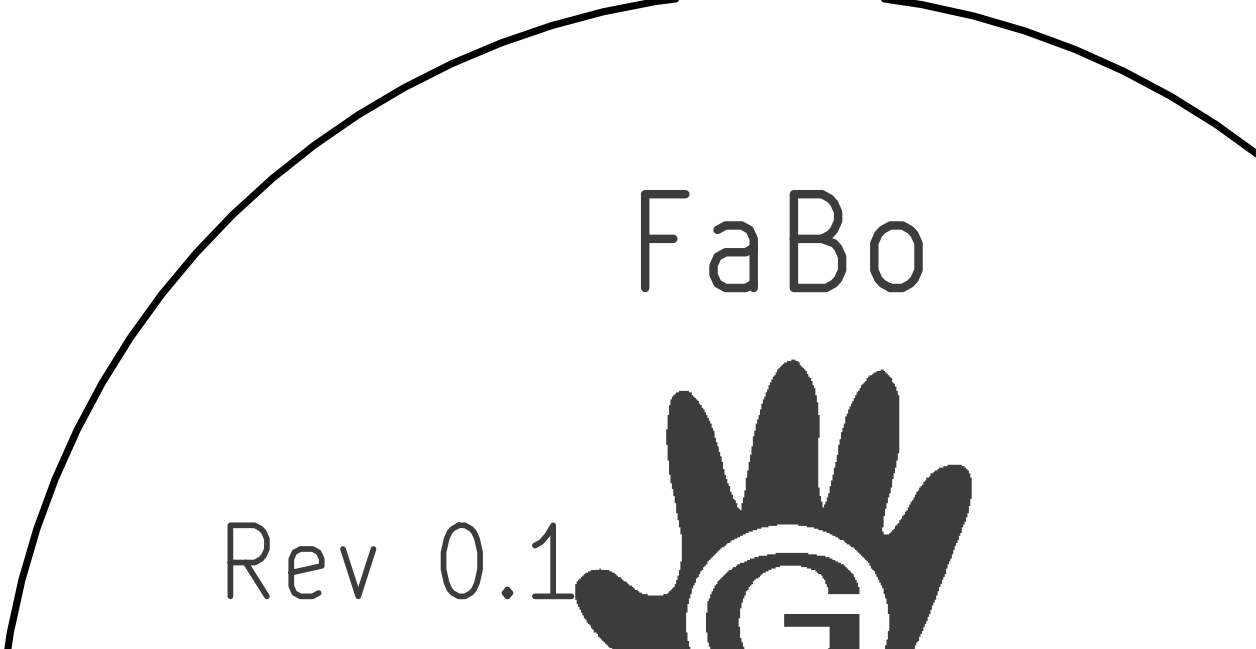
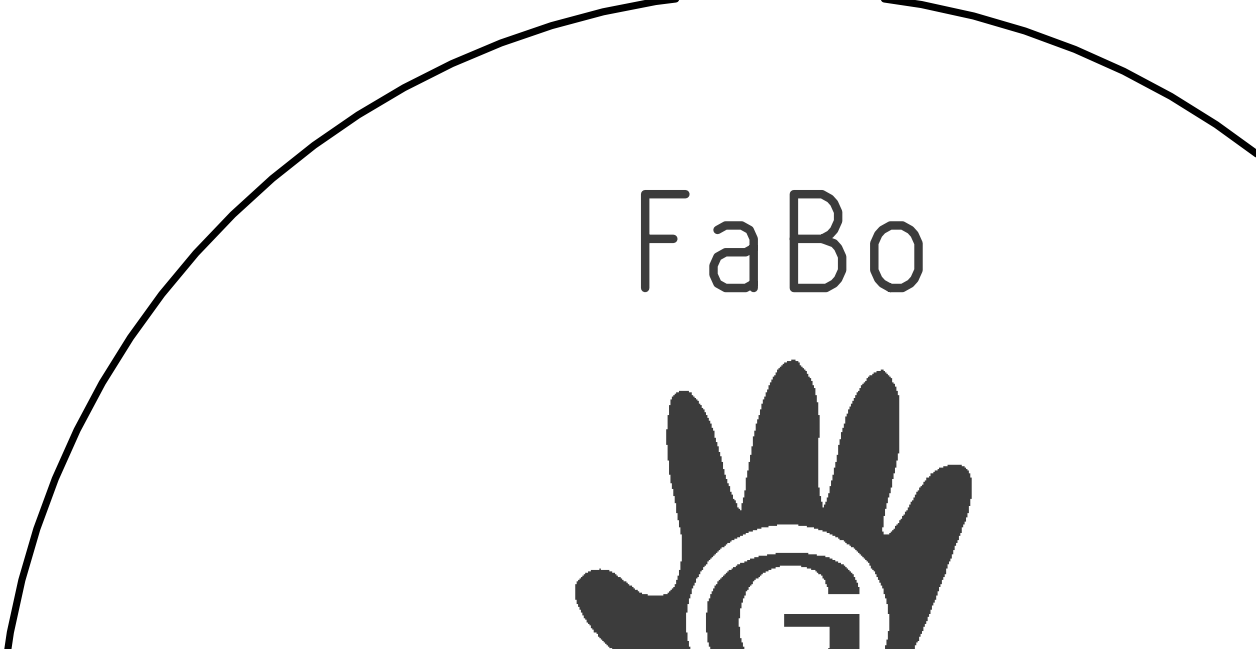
text: Rev 0.1 (400, 560) -> none

